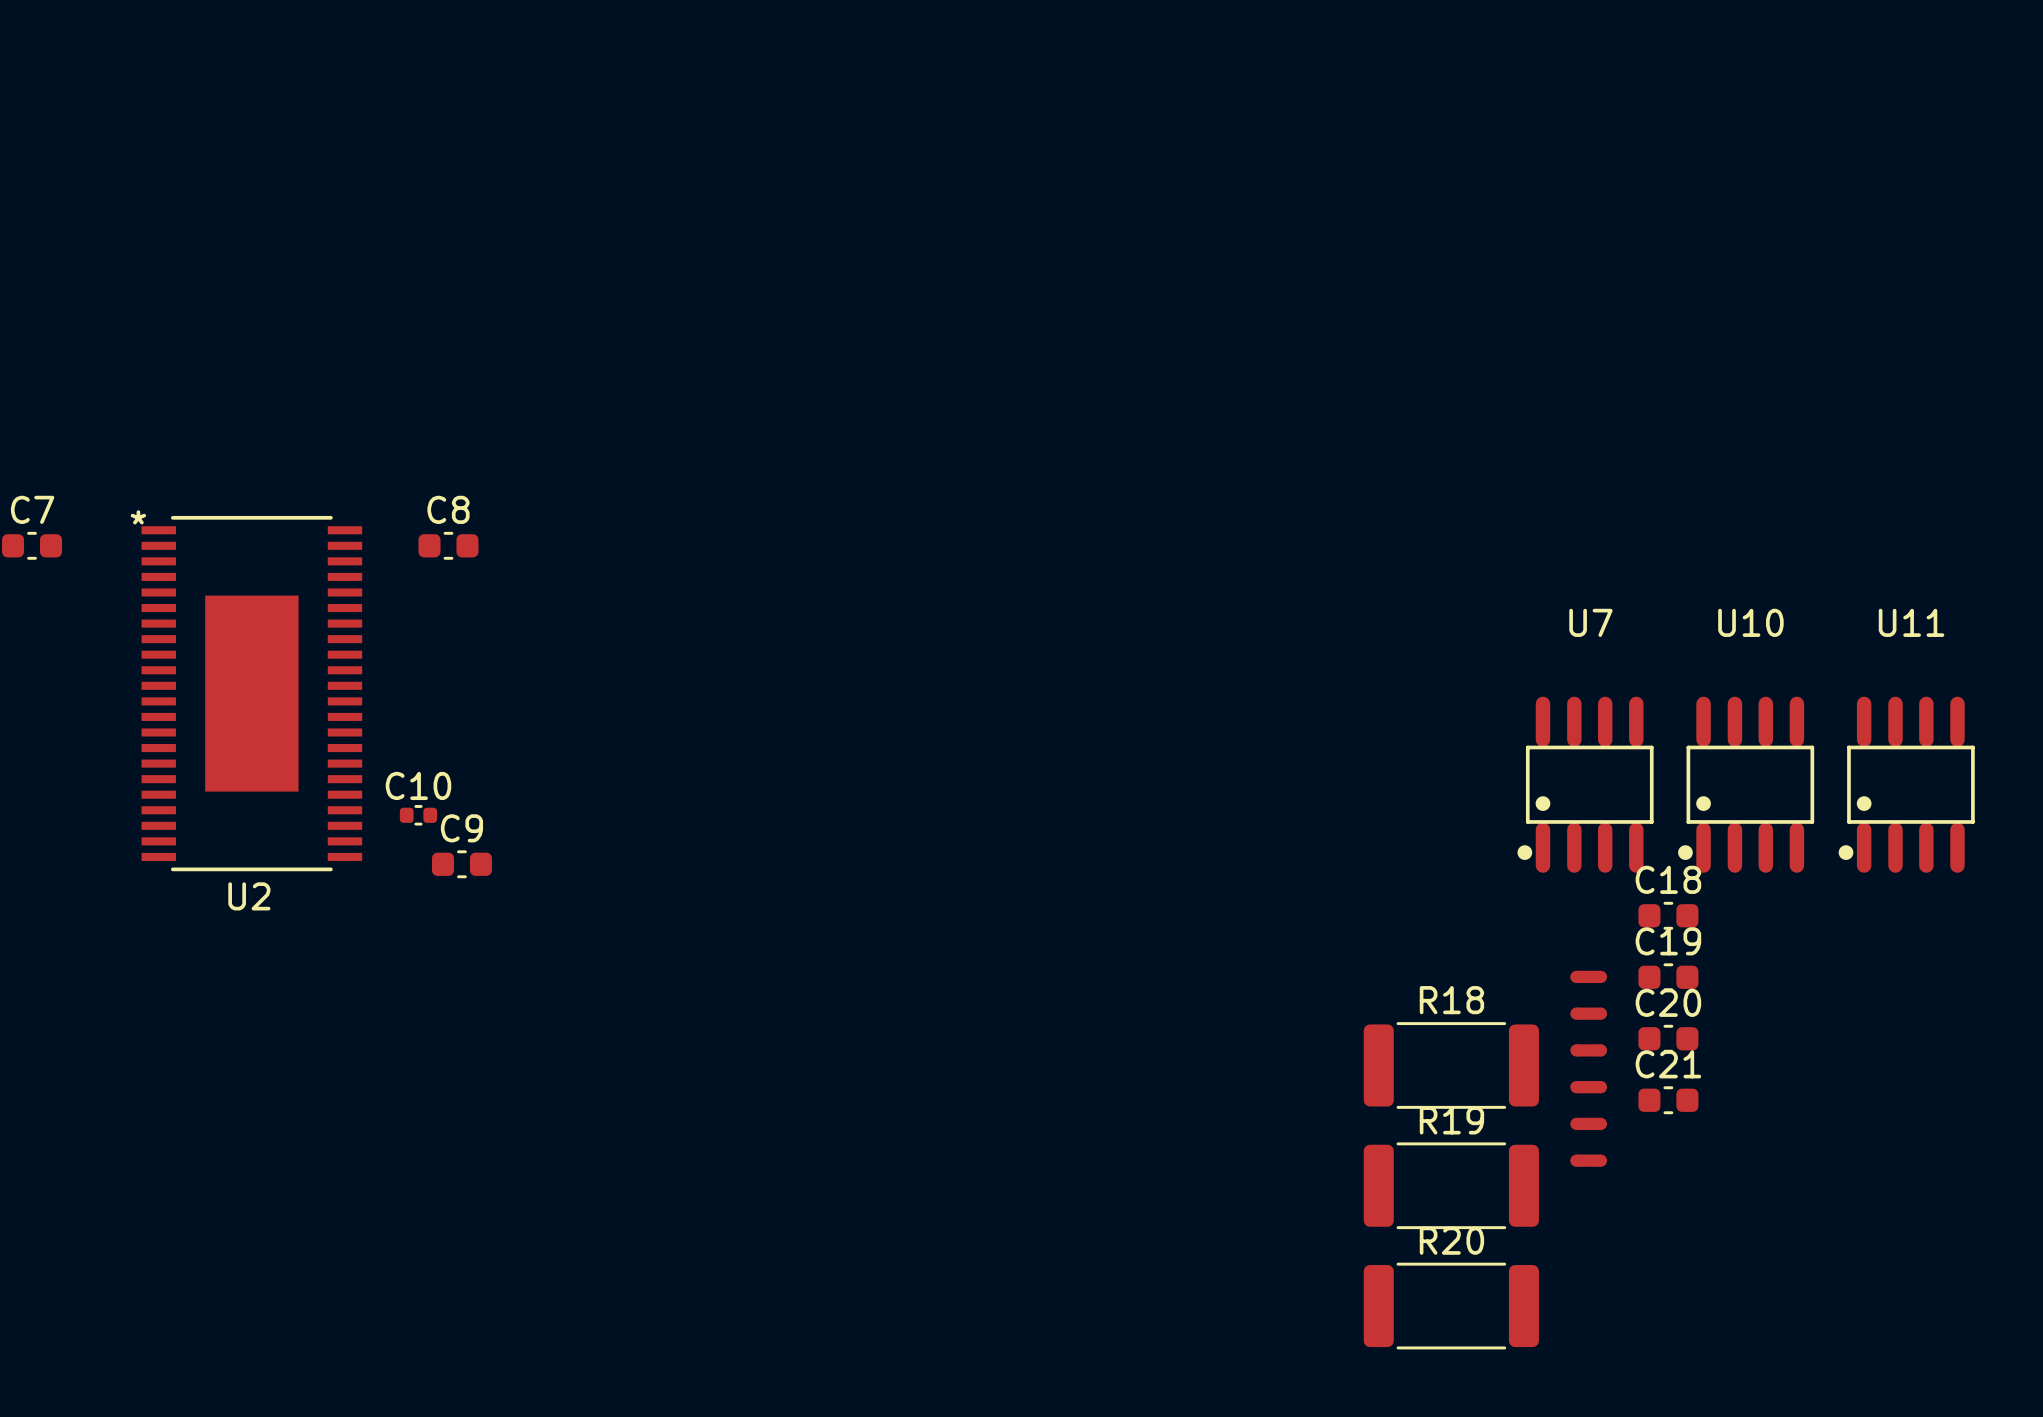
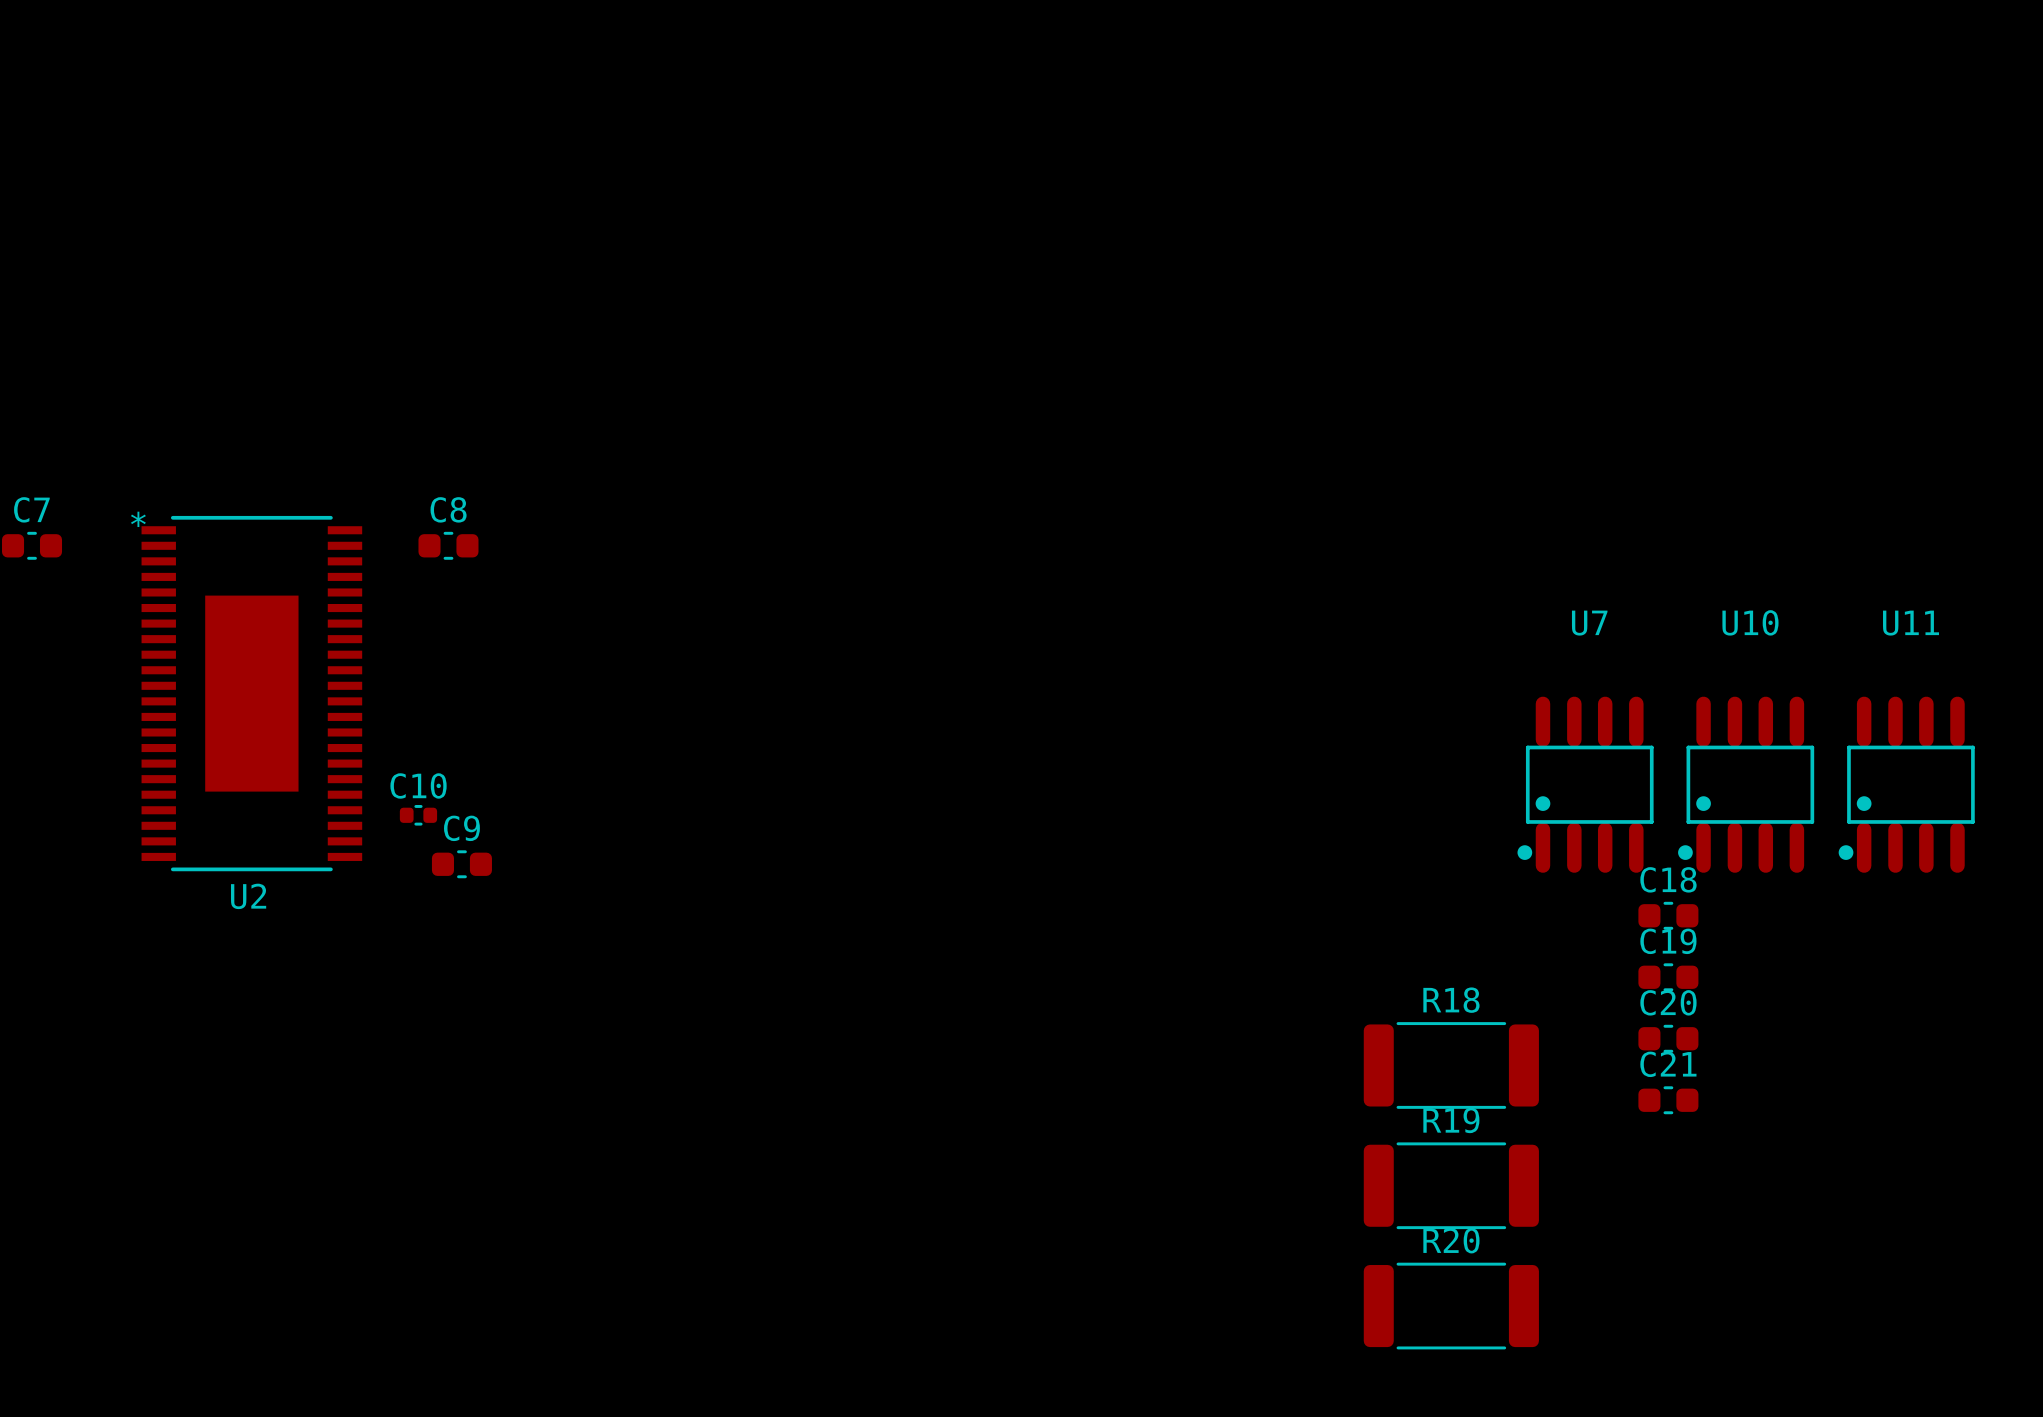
part: (1588, 976) -> none
part: (1588, 1013) -> none
part: (1588, 1050) -> none
part: (1588, 1087) -> none
part: (1588, 1123) -> none
part: (1588, 1160) -> none

